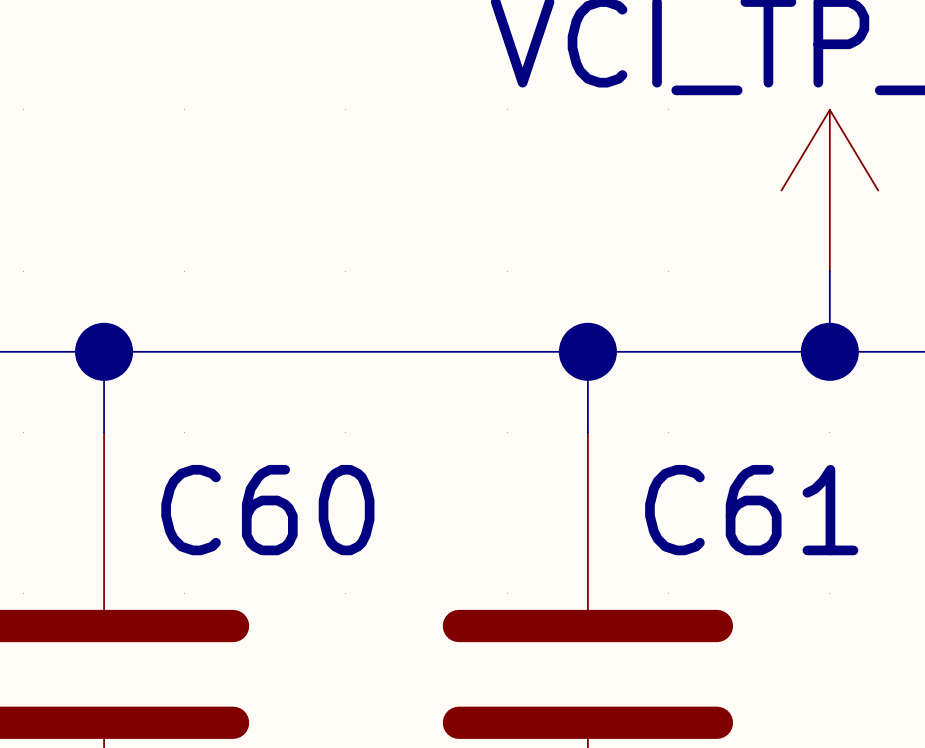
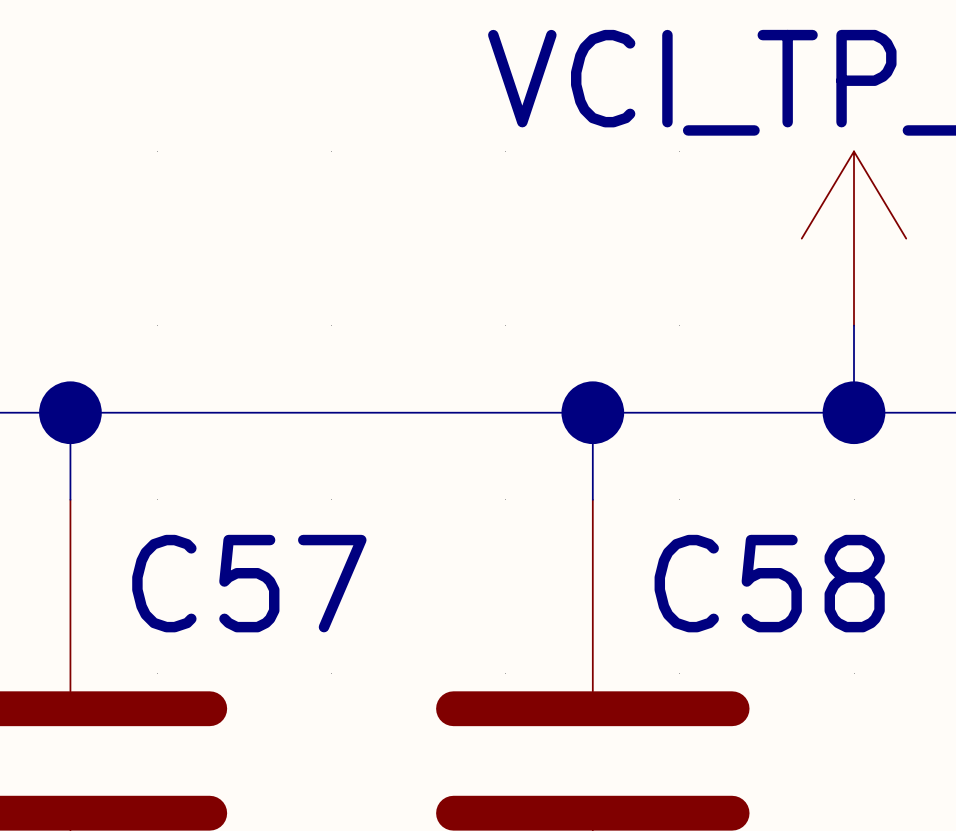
C60 name: C60 (267, 510) -> C57 (249, 583)
C61 name: C61 (751, 510) -> C58 (769, 583)

